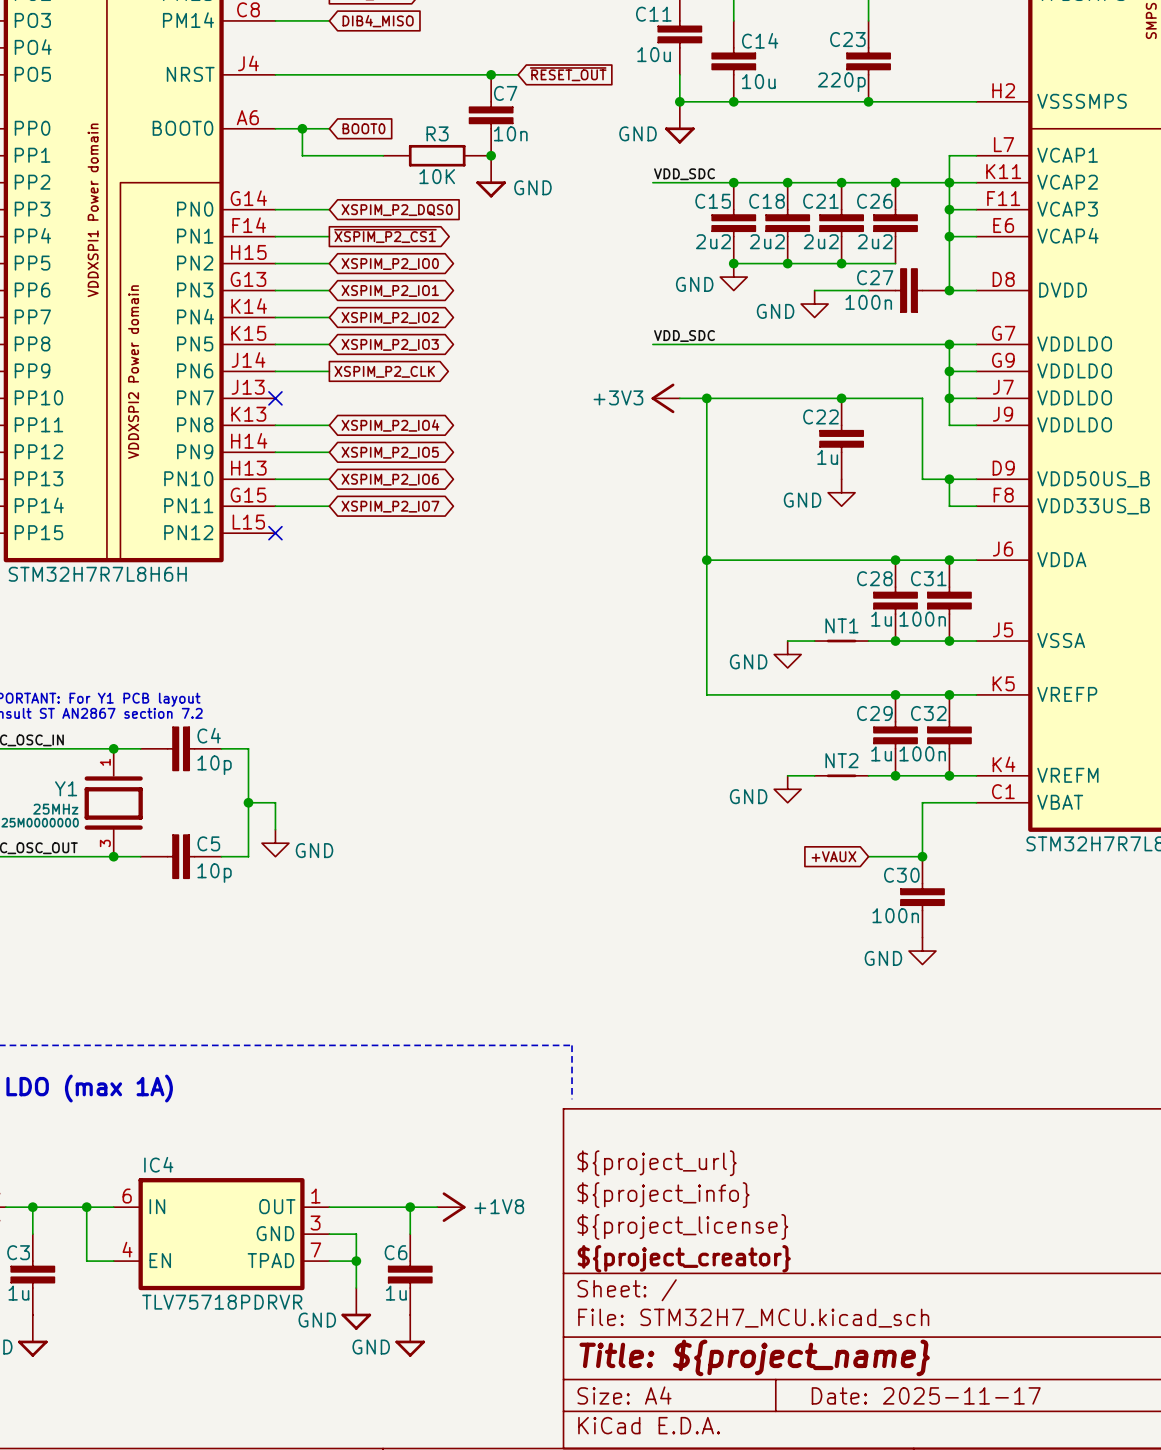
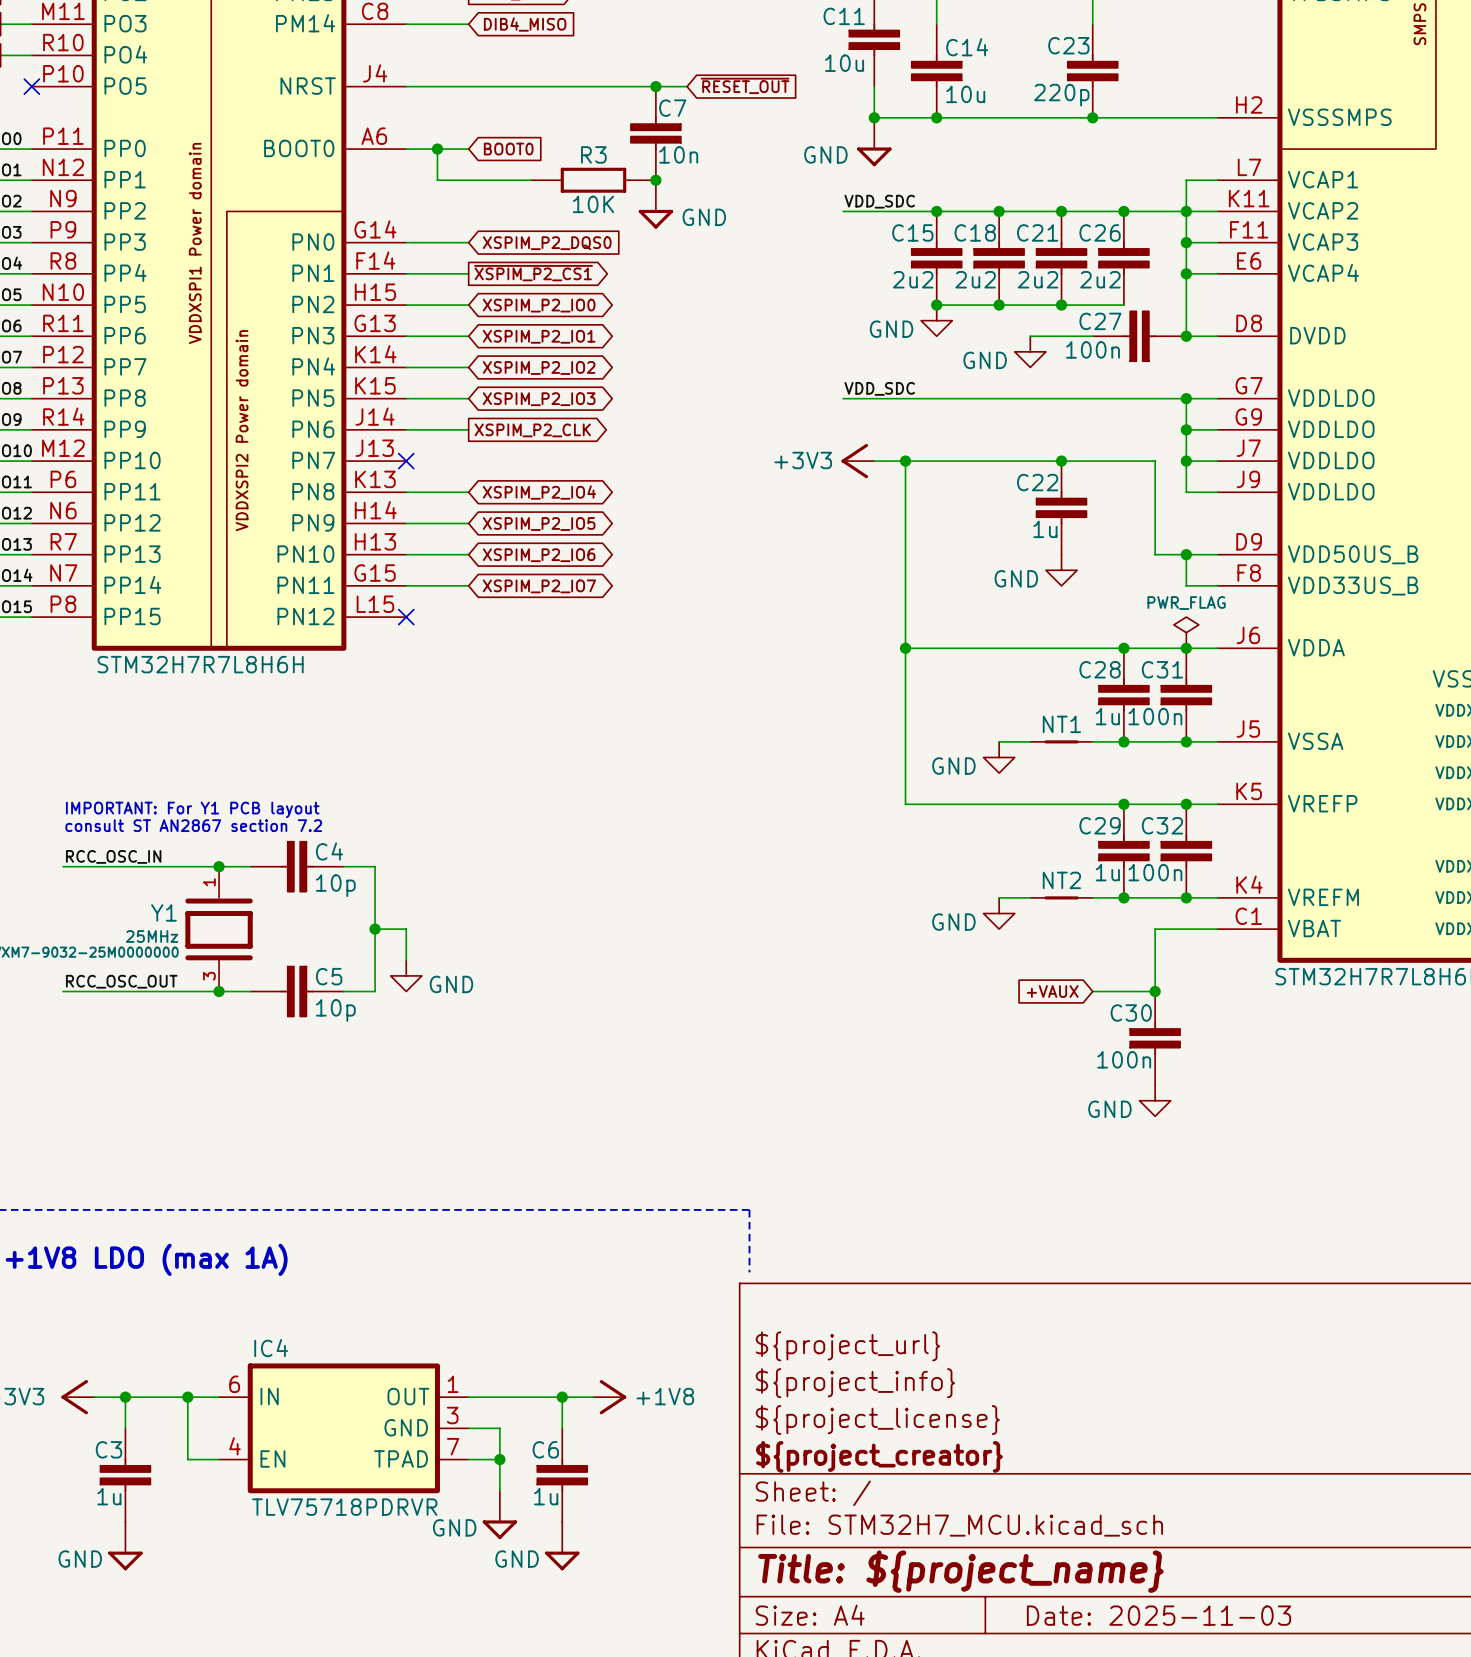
power symbol: none -> PWR_FLAG (1186, 632)
title block: Date: 2025-11-17 (926, 1395) -> Date: 2025-11-03 (1159, 1615)

